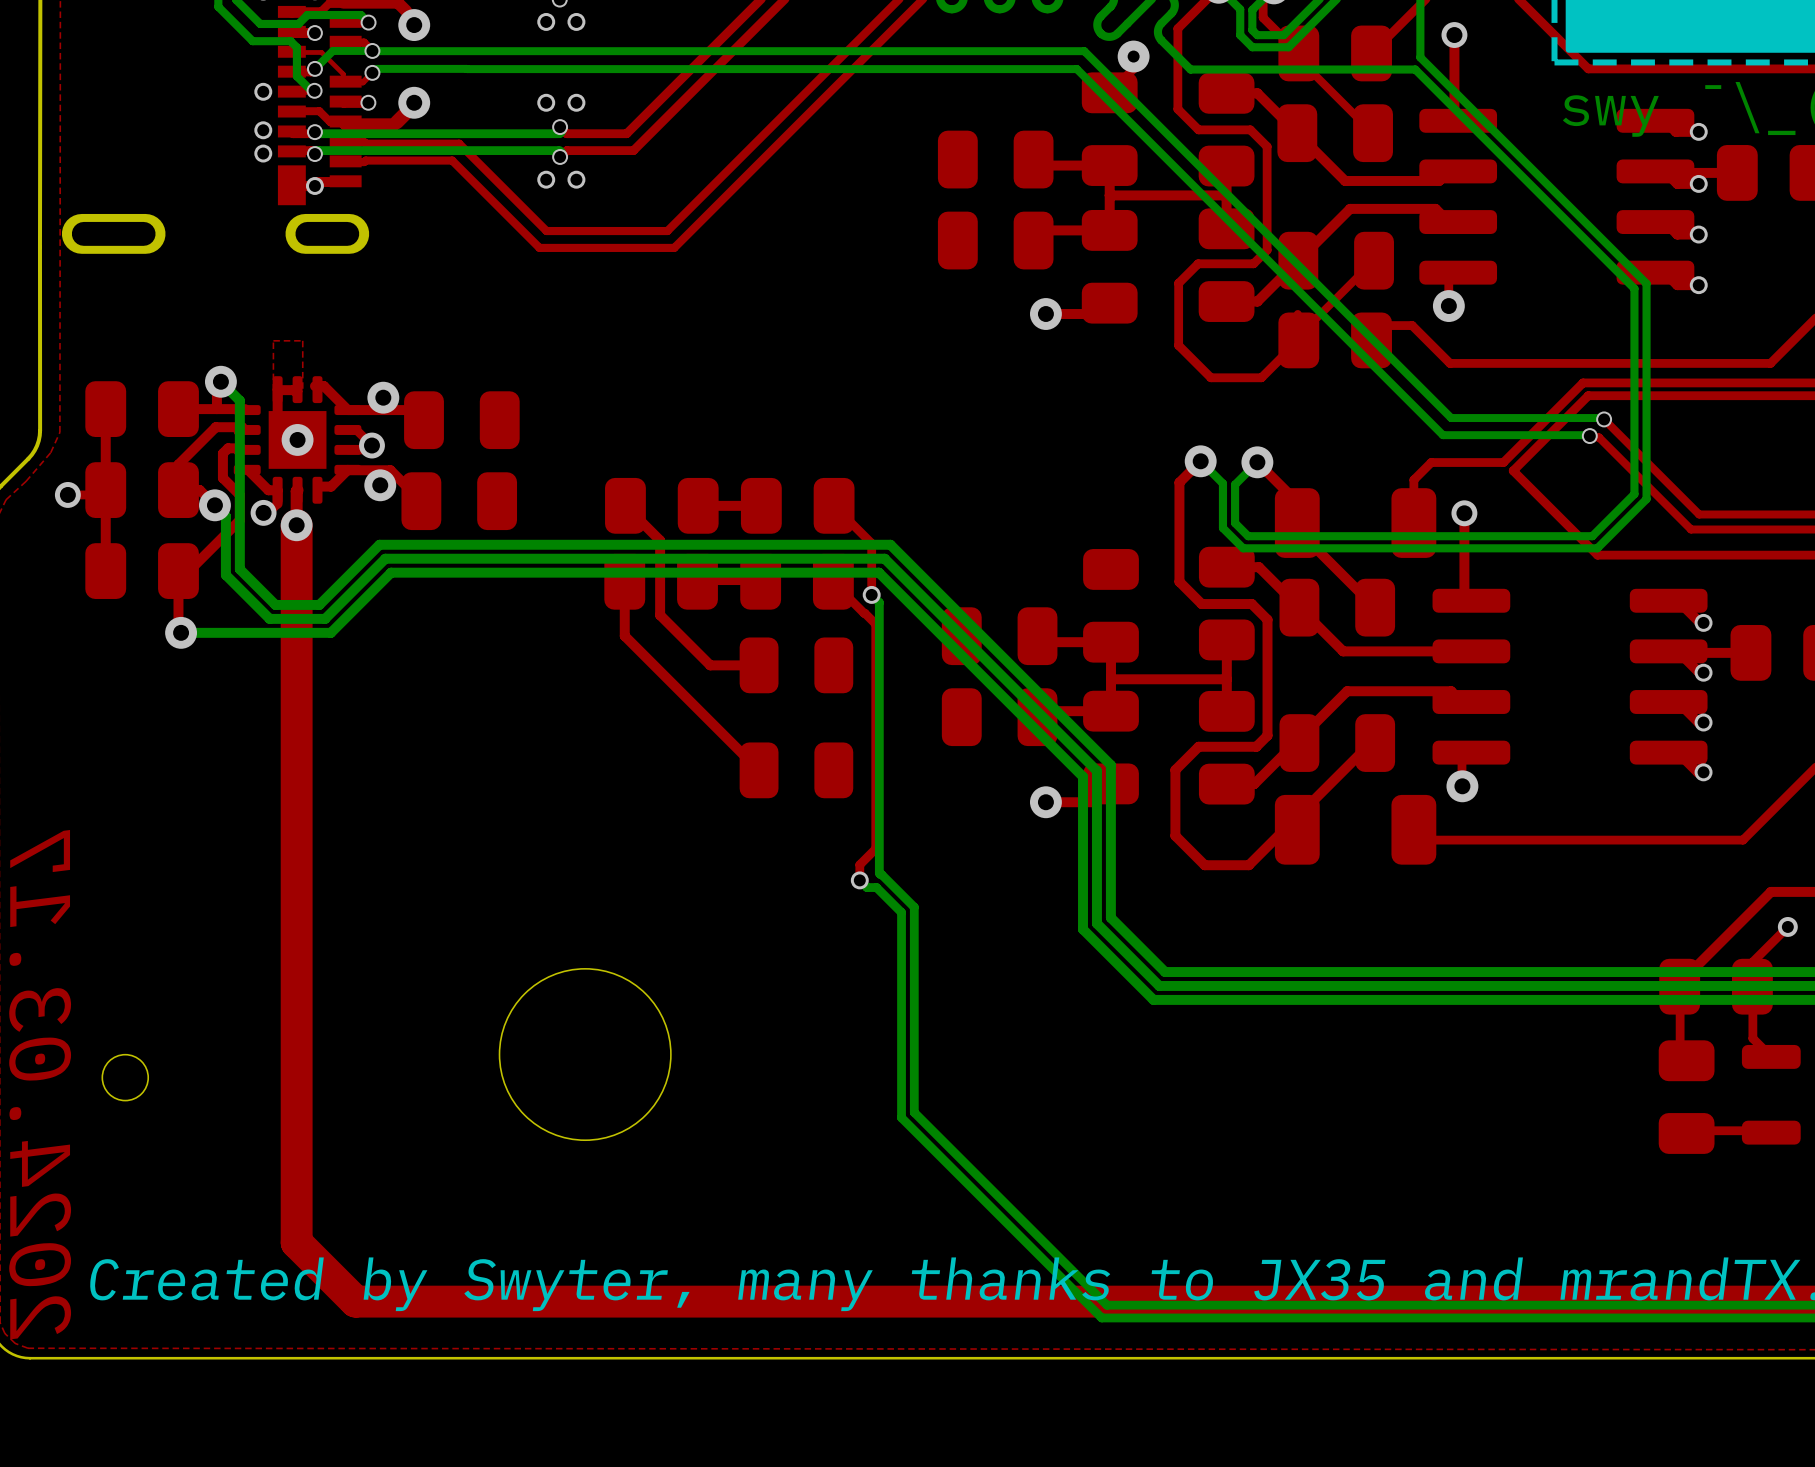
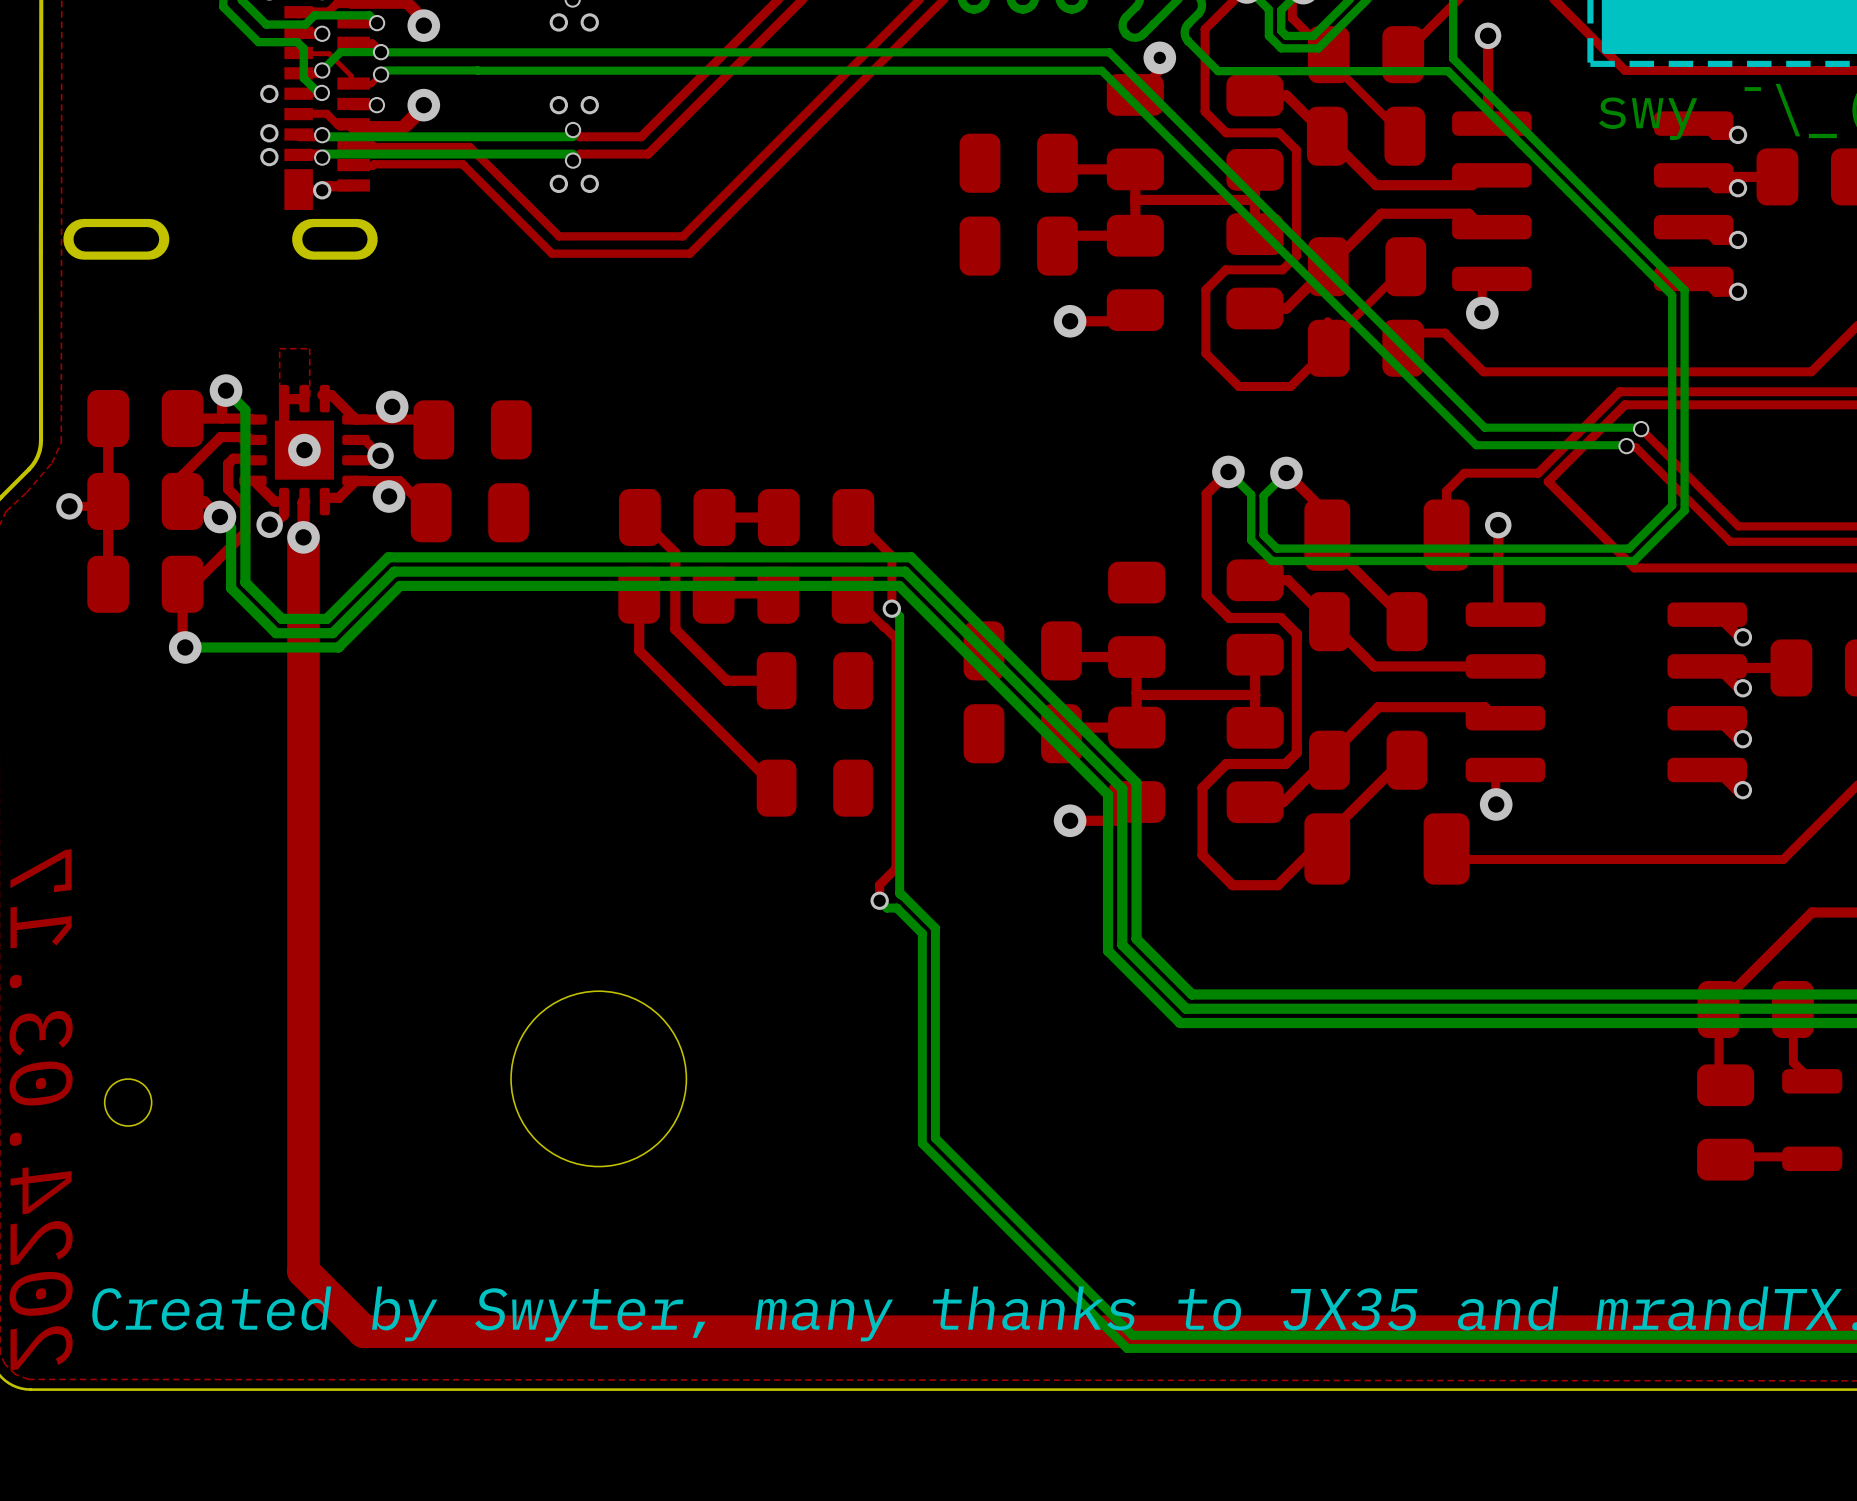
top track: (1787, 926) (1752, 962) (1752, 986) -> none
via: (1787, 926) -> none

